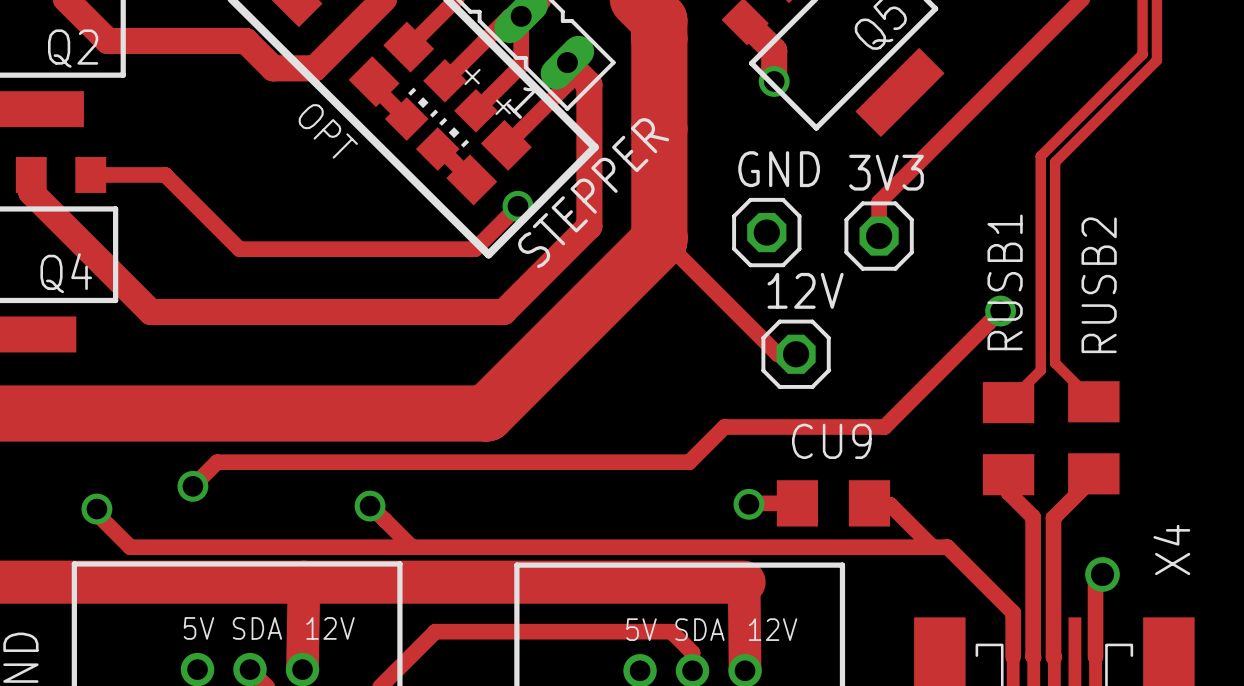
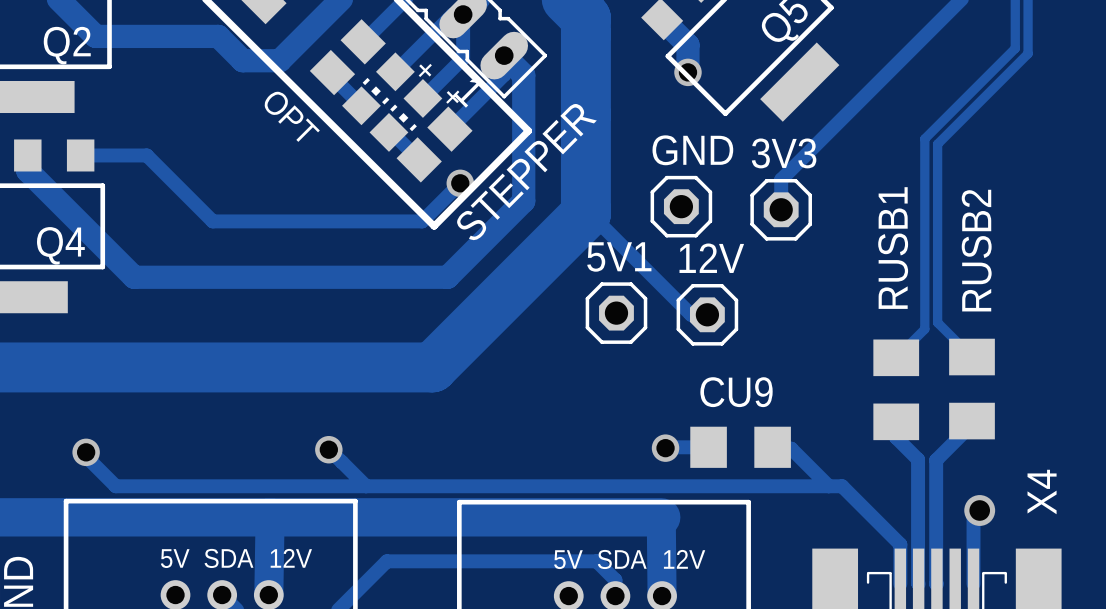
track: (1000, 311) (884, 427) (724, 427) (689, 462) (217, 462) (192, 486) -> none
via: (1000, 311) -> none
5V1: none -> (616, 313)
via: (192, 486) -> none

